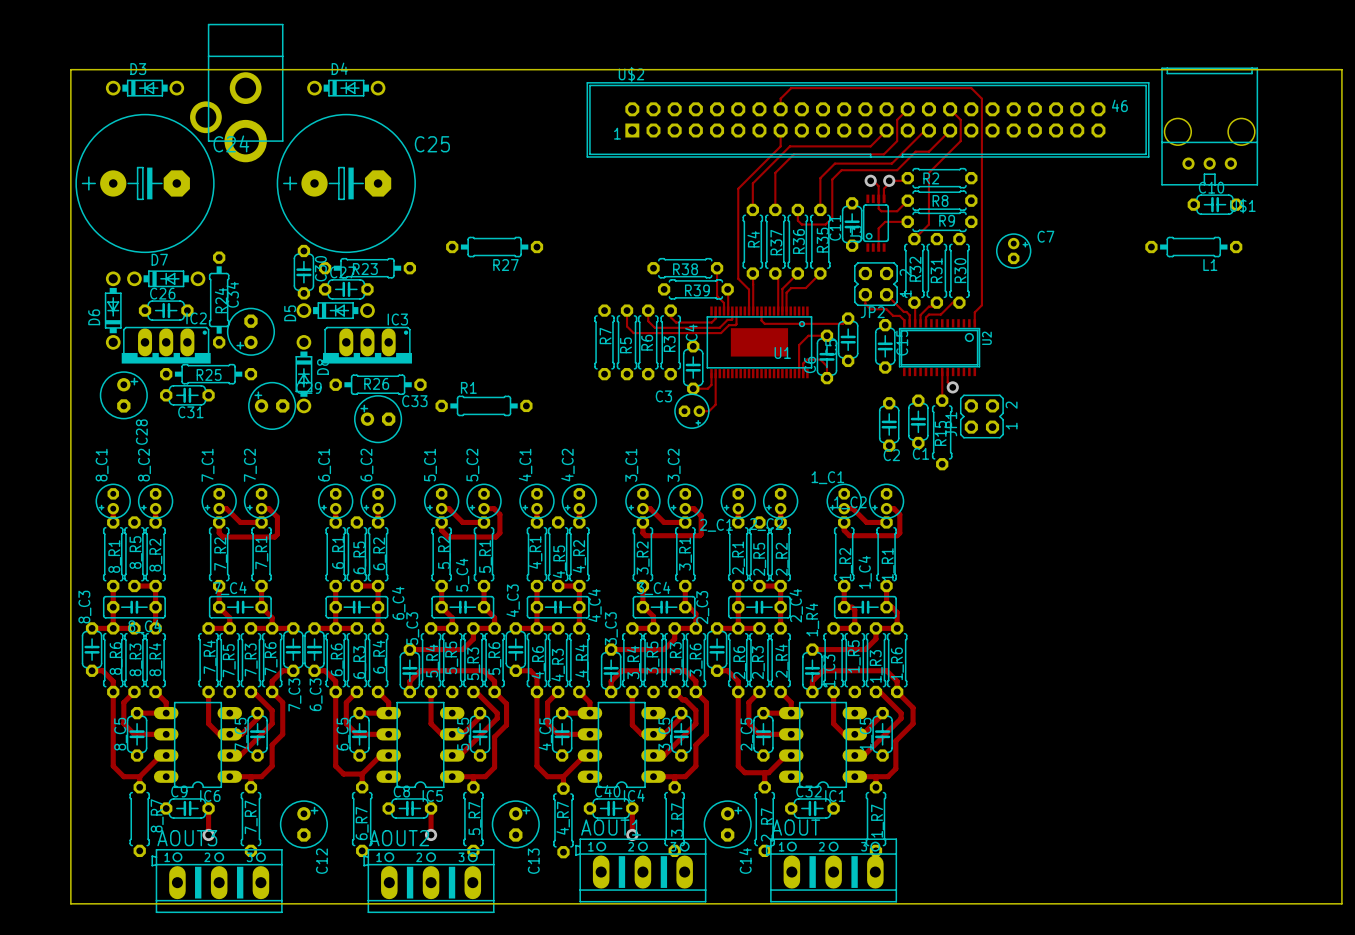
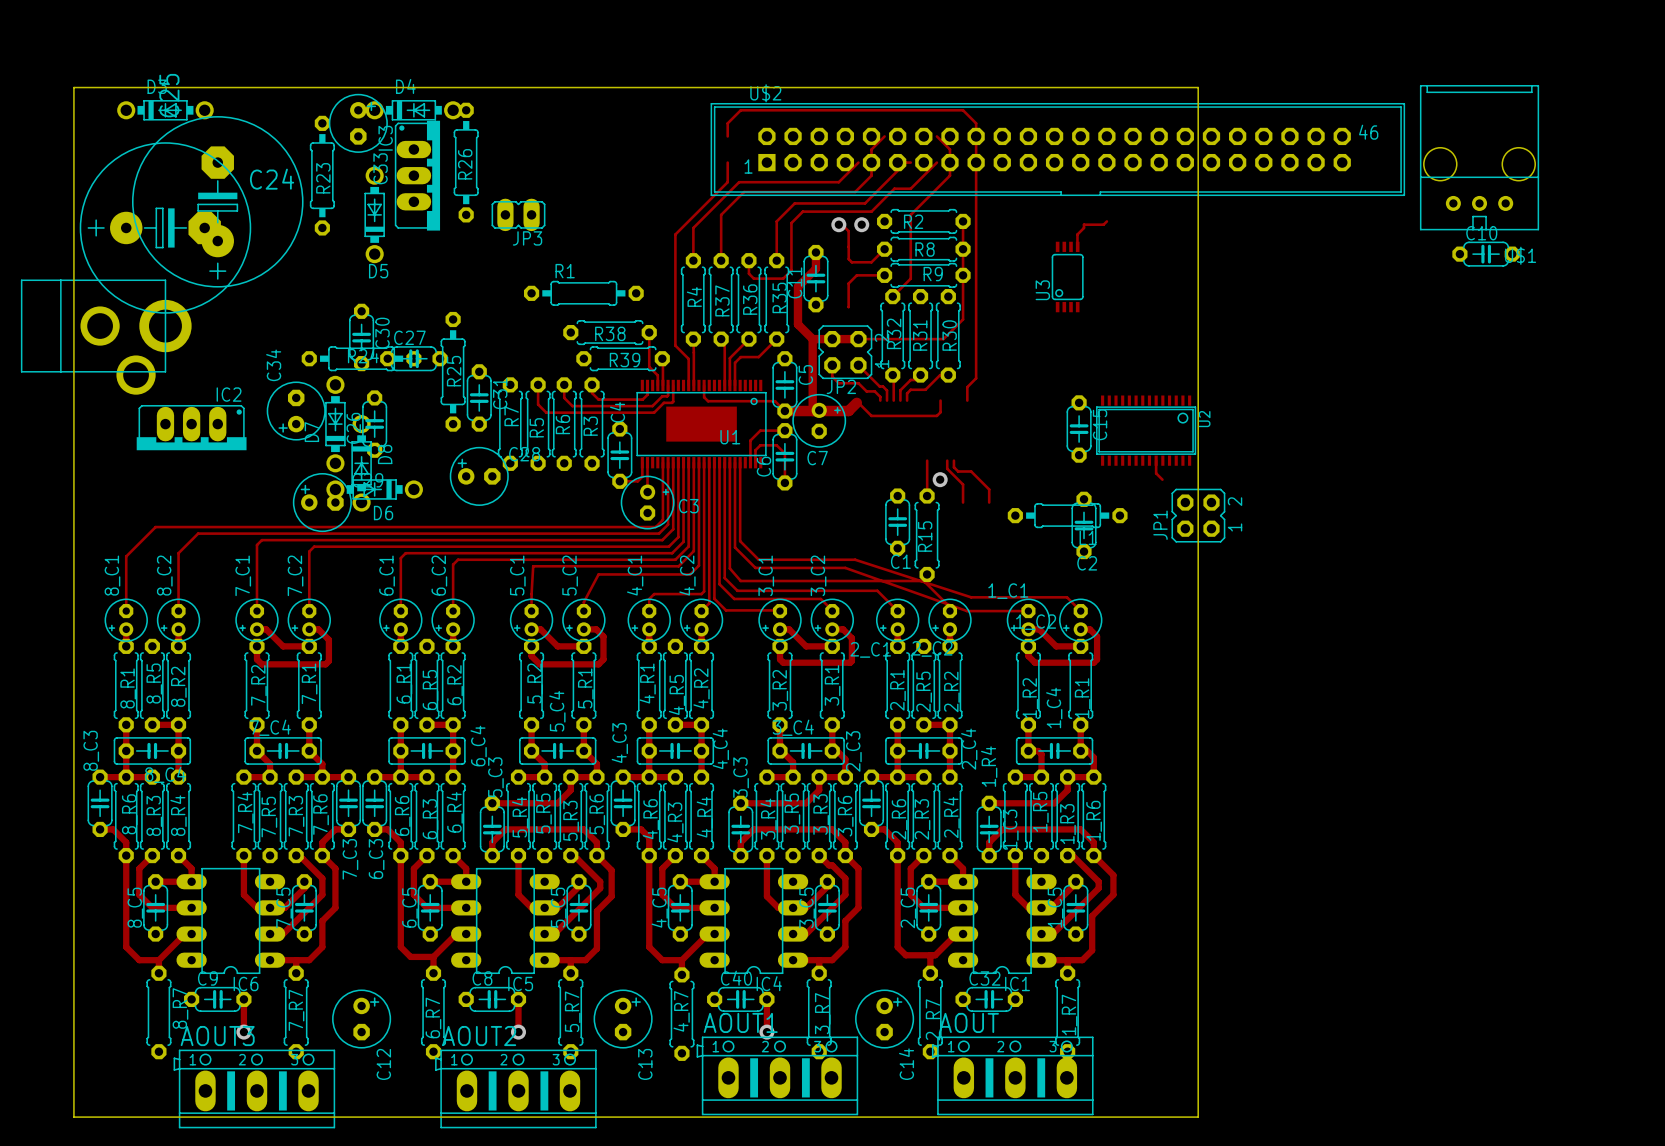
board edge: (981, 69) (1341, 69) (1341, 903) (981, 903) -> (1198, 87) (1198, 1117)
part: (236, 93) -> none
track: none -> (936, 136) (949, 149) (949, 162)
track: (780, 109) (780, 98) (791, 88) (971, 88) (981, 98) (981, 305) (974, 312) (974, 323) -> (727, 136) (727, 123) (740, 110) (963, 110) (976, 123) (976, 378) (967, 387) (967, 400)
track: (907, 109) (897, 119) (897, 141) (883, 154) (793, 154) (775, 172) (775, 209) -> (884, 136) (871, 149) (871, 175) (855, 192) (744, 192) (721, 214) (721, 260)
track: (950, 109) (960, 119) (960, 141) (928, 172) (928, 224) (914, 239) -> none
track: none -> (727, 162) (727, 182) (675, 234) (675, 345) (688, 358) (688, 385)
track: (886, 130) (870, 146) (789, 146) (752, 183) (752, 209) -> (858, 162) (838, 182) (739, 182) (693, 227) (693, 260)
track: (928, 130) (924, 130) (891, 163) (834, 163) (820, 178) (820, 209) -> (910, 162) (905, 162) (864, 203) (794, 203) (776, 221) (776, 260)
track: (950, 130) (928, 151) (915, 151) (897, 170) (841, 170) (832, 179) (832, 217) (825, 224) (801, 224) (797, 220) (797, 209) -> (936, 162) (910, 188) (894, 188) (871, 211) (802, 211) (791, 223) (791, 270) (783, 278) (753, 278) (748, 273) (748, 260)
track: (780, 141) (780, 146) (738, 188) (738, 278) (749, 289) (749, 311) -> (949, 175) (910, 214) (910, 278) (892, 296)
JP3: none -> (518, 214)
track: none -> (963, 221) (963, 319) (943, 339) (812, 339)
R2 position: (939, 178) -> (923, 221)
via: none -> (838, 224)
via: none -> (861, 224)
track: (870, 180) (878, 186) (878, 208) (881, 211) (897, 211) (907, 200) -> (838, 224) (842, 224) (848, 231) (848, 259) (851, 262) (871, 262) (884, 249)
via: (870, 180) -> none
via: (889, 180) -> none
C25 rotation: 0° (346, 183) -> 90° counterclockwise (217, 201)
C25 position: (346, 183) -> (217, 201)
R8 position: (939, 200) -> (923, 249)
track: none -> (815, 252) (815, 268) (797, 286) (797, 324) (812, 339)
track: (907, 221) (885, 221) (878, 228) (878, 247) -> (884, 275) (856, 275) (848, 283) (848, 307)
R9 position: (939, 221) -> (923, 275)
C11 position: (852, 224) -> (815, 278)
C7 footprint: [996, 233, 1032, 269] -> [792, 393, 847, 448]
C7 name position: C7 (1045, 236) -> C7 (817, 458)
R4 position: (752, 241) -> (693, 299)
R37 position: (775, 241) -> (721, 299)
R36 position: (797, 241) -> (748, 299)
R35 position: (820, 241) -> (776, 299)
R27: (494, 247) -> none
L1 position: (1193, 247) -> (1067, 515)
R23 rotation: 0° (367, 268) -> 90° clockwise (322, 175)
R23 position: (367, 268) -> (322, 175)
R38 position: (685, 268) -> (610, 332)
track: (717, 268) (717, 296) (724, 302) (724, 311) -> (649, 332) (649, 366) (657, 375) (657, 385)
R32 position: (914, 270) -> (892, 335)
R31 position: (936, 270) -> (920, 335)
R30 position: (959, 270) -> (948, 335)
part: none -> (106, 337)
track: none -> (812, 339) (812, 411)
track: (752, 273) (753, 311) -> (693, 339) (693, 385)
track: (775, 273) (778, 276) (778, 311) -> (721, 339) (724, 342) (724, 385)
track: (797, 273) (782, 288) (782, 311) -> (748, 339) (729, 358) (729, 385)
track: (820, 273) (805, 288) (791, 288) (786, 292) (786, 311) -> (776, 339) (758, 357) (740, 357) (735, 362) (735, 385)
D7 rotation: 0° (166, 278) -> 90° counterclockwise (335, 424)
D7 position: (166, 278) -> (335, 424)
JP2 position: (875, 284) -> (845, 352)
R39 position: (695, 289) -> (623, 358)
track: (727, 289) (728, 311) -> (662, 358) (662, 385)
track: (865, 294) (865, 303) (870, 309) (886, 309) (893, 315) (899, 315) (904, 320) (904, 323) -> (832, 365) (832, 376) (838, 383) (858, 383) (866, 391) (874, 391) (880, 396) (880, 400)
track: (886, 294) (909, 315) (909, 323) -> (858, 365) (879, 386) (882, 386) (887, 390) (887, 400)
R24 rotation: 0° (219, 299) -> 90° clockwise (361, 358)
R24 position: (219, 299) -> (361, 358)
track: (914, 302) (915, 323) -> (892, 375) (893, 400)
track: (936, 302) (932, 306) (928, 306) (920, 314) (920, 323) -> (920, 375) (915, 379) (910, 379) (900, 390) (900, 400)
track: (959, 302) (952, 302) (940, 314) (928, 314) (925, 317) (925, 323) -> (948, 375) (940, 375) (925, 389) (910, 389) (907, 393) (907, 400)
D6 rotation: 0° (113, 310) -> 90° counterclockwise (374, 489)
D6 position: (113, 310) -> (374, 489)
C26 rotation: 0° (166, 310) -> 90° counterclockwise (374, 424)
C26 position: (166, 310) -> (374, 424)
D5 rotation: 0° (335, 310) -> 90° counterclockwise (374, 214)
D5 position: (335, 310) -> (374, 214)
track: (627, 310) (627, 326) (633, 333) (721, 333) (728, 325) (736, 324) (736, 311) -> (538, 384) (538, 404) (546, 412) (654, 412) (663, 402) (673, 401) (673, 385)
track: (648, 310) (648, 321) (654, 327) (719, 327) (727, 319) (732, 319) (732, 311) -> (564, 384) (564, 397) (572, 406) (652, 406) (662, 396) (668, 395) (668, 385)
track: (670, 310) (670, 317) (676, 322) (711, 322) (715, 318) (715, 311) -> (592, 384) (592, 393) (598, 399) (642, 399) (647, 394) (647, 385)
track: none -> (704, 385) (704, 397) (708, 401) (775, 401) (784, 411) (848, 411) (856, 402)
track: (761, 311) (761, 320) (764, 323) (842, 323) (848, 318) -> none
track: none -> (940, 400) (940, 412) (936, 415) (871, 415) (858, 402)
track: (826, 335) (808, 335) (799, 345) (799, 373) -> none
C5 rotation: 0° (848, 339) -> 180° (784, 384)
C5 position: (848, 339) -> (784, 384)
R7 position: (604, 342) -> (510, 424)
R5 position: (627, 342) -> (538, 424)
R6 position: (648, 342) -> (564, 424)
R3 position: (670, 342) -> (592, 424)
U1 position: (759, 342) -> (701, 424)
IC3 rotation: 0° (367, 345) -> 90° counterclockwise (417, 175)
IC3 position: (367, 345) -> (417, 175)
track: none -> (784, 430) (760, 430) (750, 440) (750, 462)
C6 position: (826, 356) -> (784, 456)
C4 position: (693, 367) -> (619, 455)
track: none -> (947, 460) (947, 468) (963, 484) (963, 502)
track: none -> (953, 460) (953, 467) (958, 471) (971, 471) (989, 489) (989, 502)
track: (942, 372) (942, 400) -> (927, 460) (927, 495)
track: none -> (647, 462) (647, 491)
track: none -> (662, 462) (662, 519) (655, 527) (155, 527) (126, 556) (126, 611)
track: none -> (668, 462) (668, 524) (659, 533) (198, 533) (178, 553) (178, 611)
track: none -> (673, 462) (673, 529) (662, 540) (261, 540) (256, 545) (256, 611)
track: none -> (678, 462) (678, 537) (668, 546) (314, 546) (309, 551) (309, 611)
track: none -> (683, 462) (683, 541) (672, 553) (405, 553) (400, 558) (400, 611)
track: none -> (688, 462) (688, 546) (675, 559) (458, 559) (453, 564) (453, 611)
track: none -> (693, 462) (693, 551) (678, 566) (533, 566) (531, 611)
track: none -> (698, 462) (698, 565) (690, 574) (598, 574) (583, 602) (583, 611)
track: none -> (704, 462) (704, 591) (701, 594) (654, 594) (649, 598) (649, 611)
track: none -> (709, 462) (709, 603) (701, 611)
track: none -> (714, 462) (714, 598) (726, 610) (780, 611)
track: none -> (719, 462) (719, 584) (734, 598) (820, 598) (832, 611)
track: none -> (724, 462) (724, 578) (737, 590) (877, 590) (897, 611)
track: none -> (729, 462) (729, 568) (740, 581) (923, 581) (949, 607) (949, 611)
track: none -> (735, 462) (735, 547) (755, 567) (845, 567) (966, 611) (1028, 611)
track: none -> (740, 462) (740, 541) (758, 559) (855, 559) (971, 597) (1067, 597) (1080, 611)
track: none -> (755, 462) (755, 450) (760, 445) (776, 445) (784, 453) (784, 482)
track: (711, 373) (711, 385) (707, 388) (693, 388) -> (642, 462) (642, 476) (637, 481) (619, 481)
track: (715, 373) (715, 404) (709, 411) (699, 411) -> none
track: (803, 373) (803, 363) (807, 359) (820, 359) (826, 366) (826, 378) -> none
R25 rotation: 0° (208, 374) -> 90° clockwise (453, 371)
R25 position: (208, 374) -> (453, 371)
R26 rotation: 0° (378, 384) -> 90° clockwise (466, 162)
R26 position: (378, 384) -> (466, 162)
via: none -> (940, 479)
via: (952, 387) -> none
C3 footprint: [674, 393, 710, 429] -> [620, 475, 675, 530]
C28 rotation: 0° (123, 395) -> 90° counterclockwise (479, 476)
C28 position: (123, 395) -> (479, 476)
C31 rotation: 0° (187, 395) -> 90° counterclockwise (479, 397)
C31 position: (187, 395) -> (479, 397)
C3 name position: C3 (663, 396) -> C3 (688, 506)
R1 position: (484, 405) -> (583, 293)
C33 rotation: 0° (378, 419) -> 90° clockwise (358, 123)
C33 position: (378, 419) -> (358, 123)
C1 position: (918, 421) -> (897, 522)
R15 position: (942, 432) -> (927, 535)

